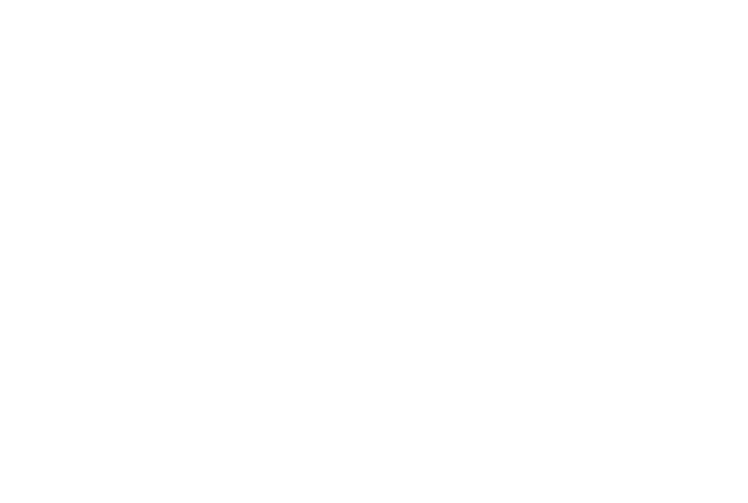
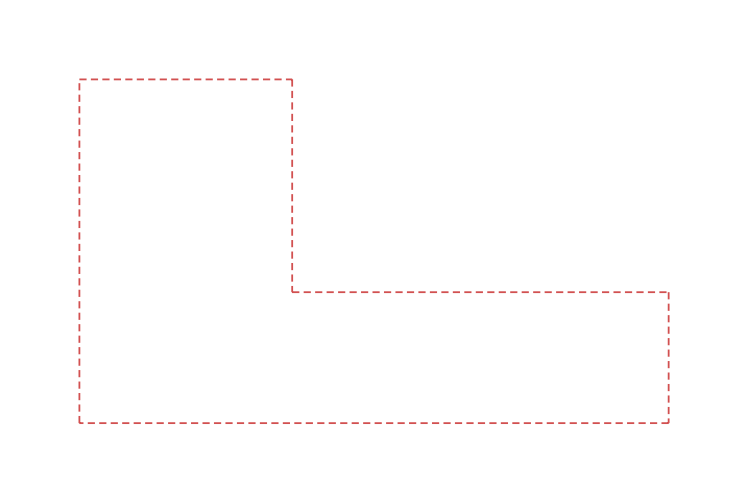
zone outline: none -> (79, 79) (79, 423) (668, 423) (668, 292) (292, 292) (292, 79) (79, 79)

